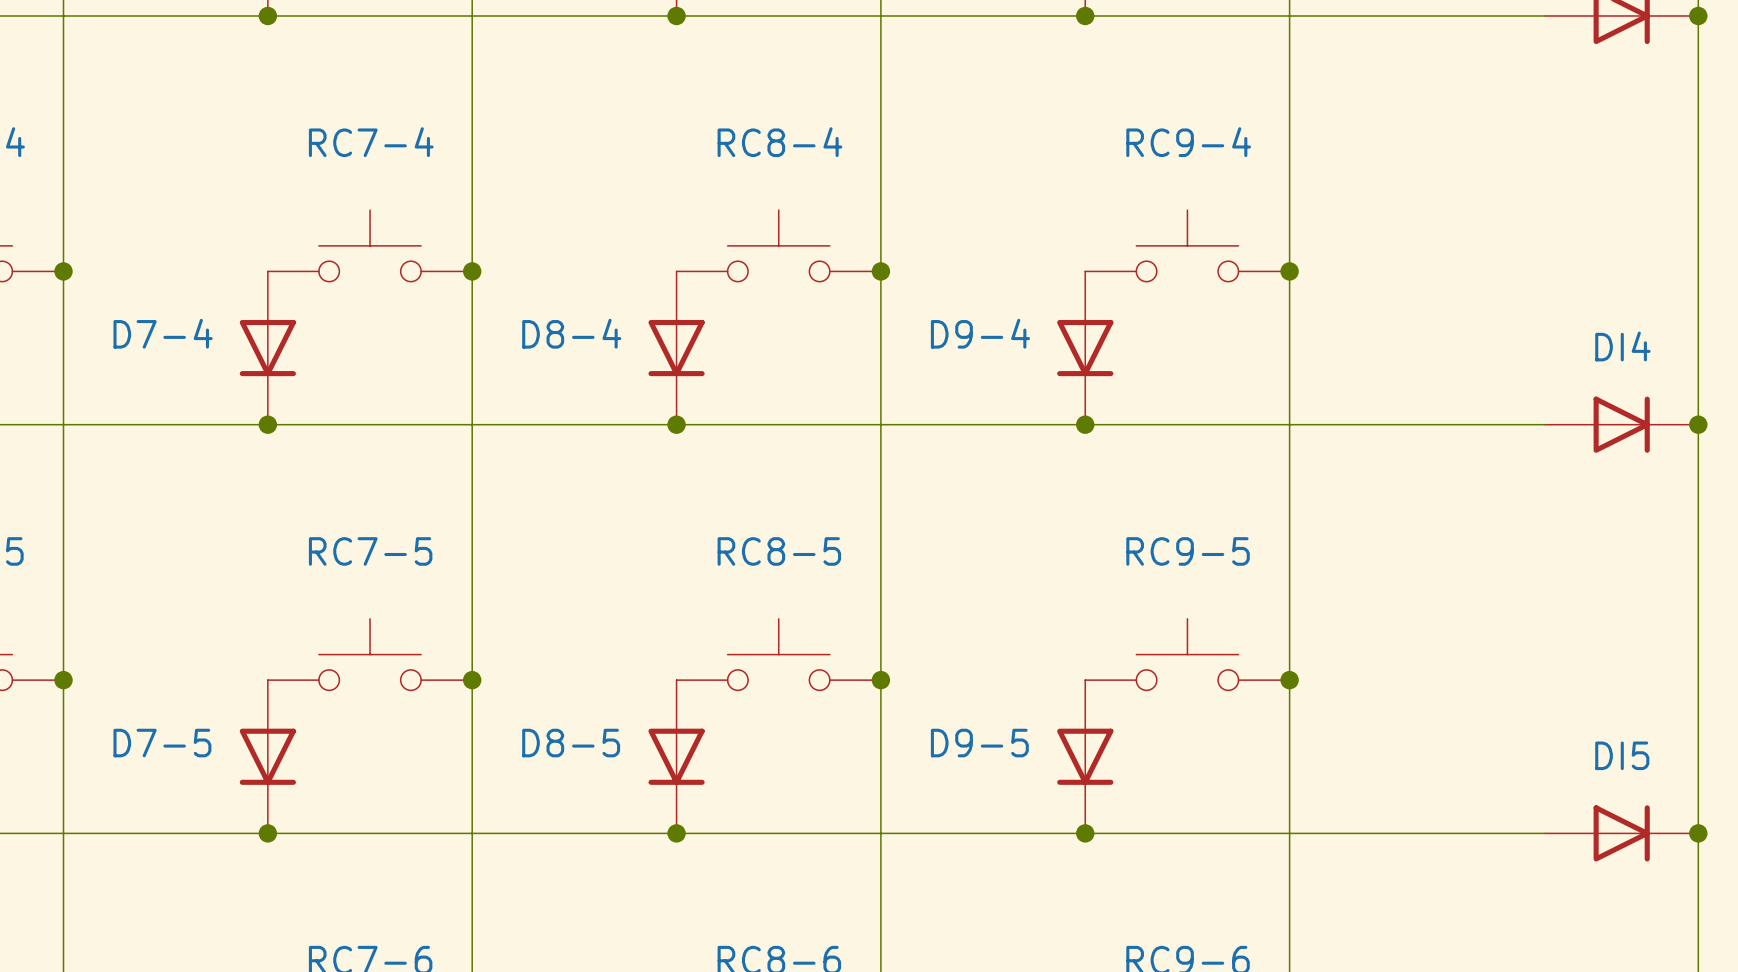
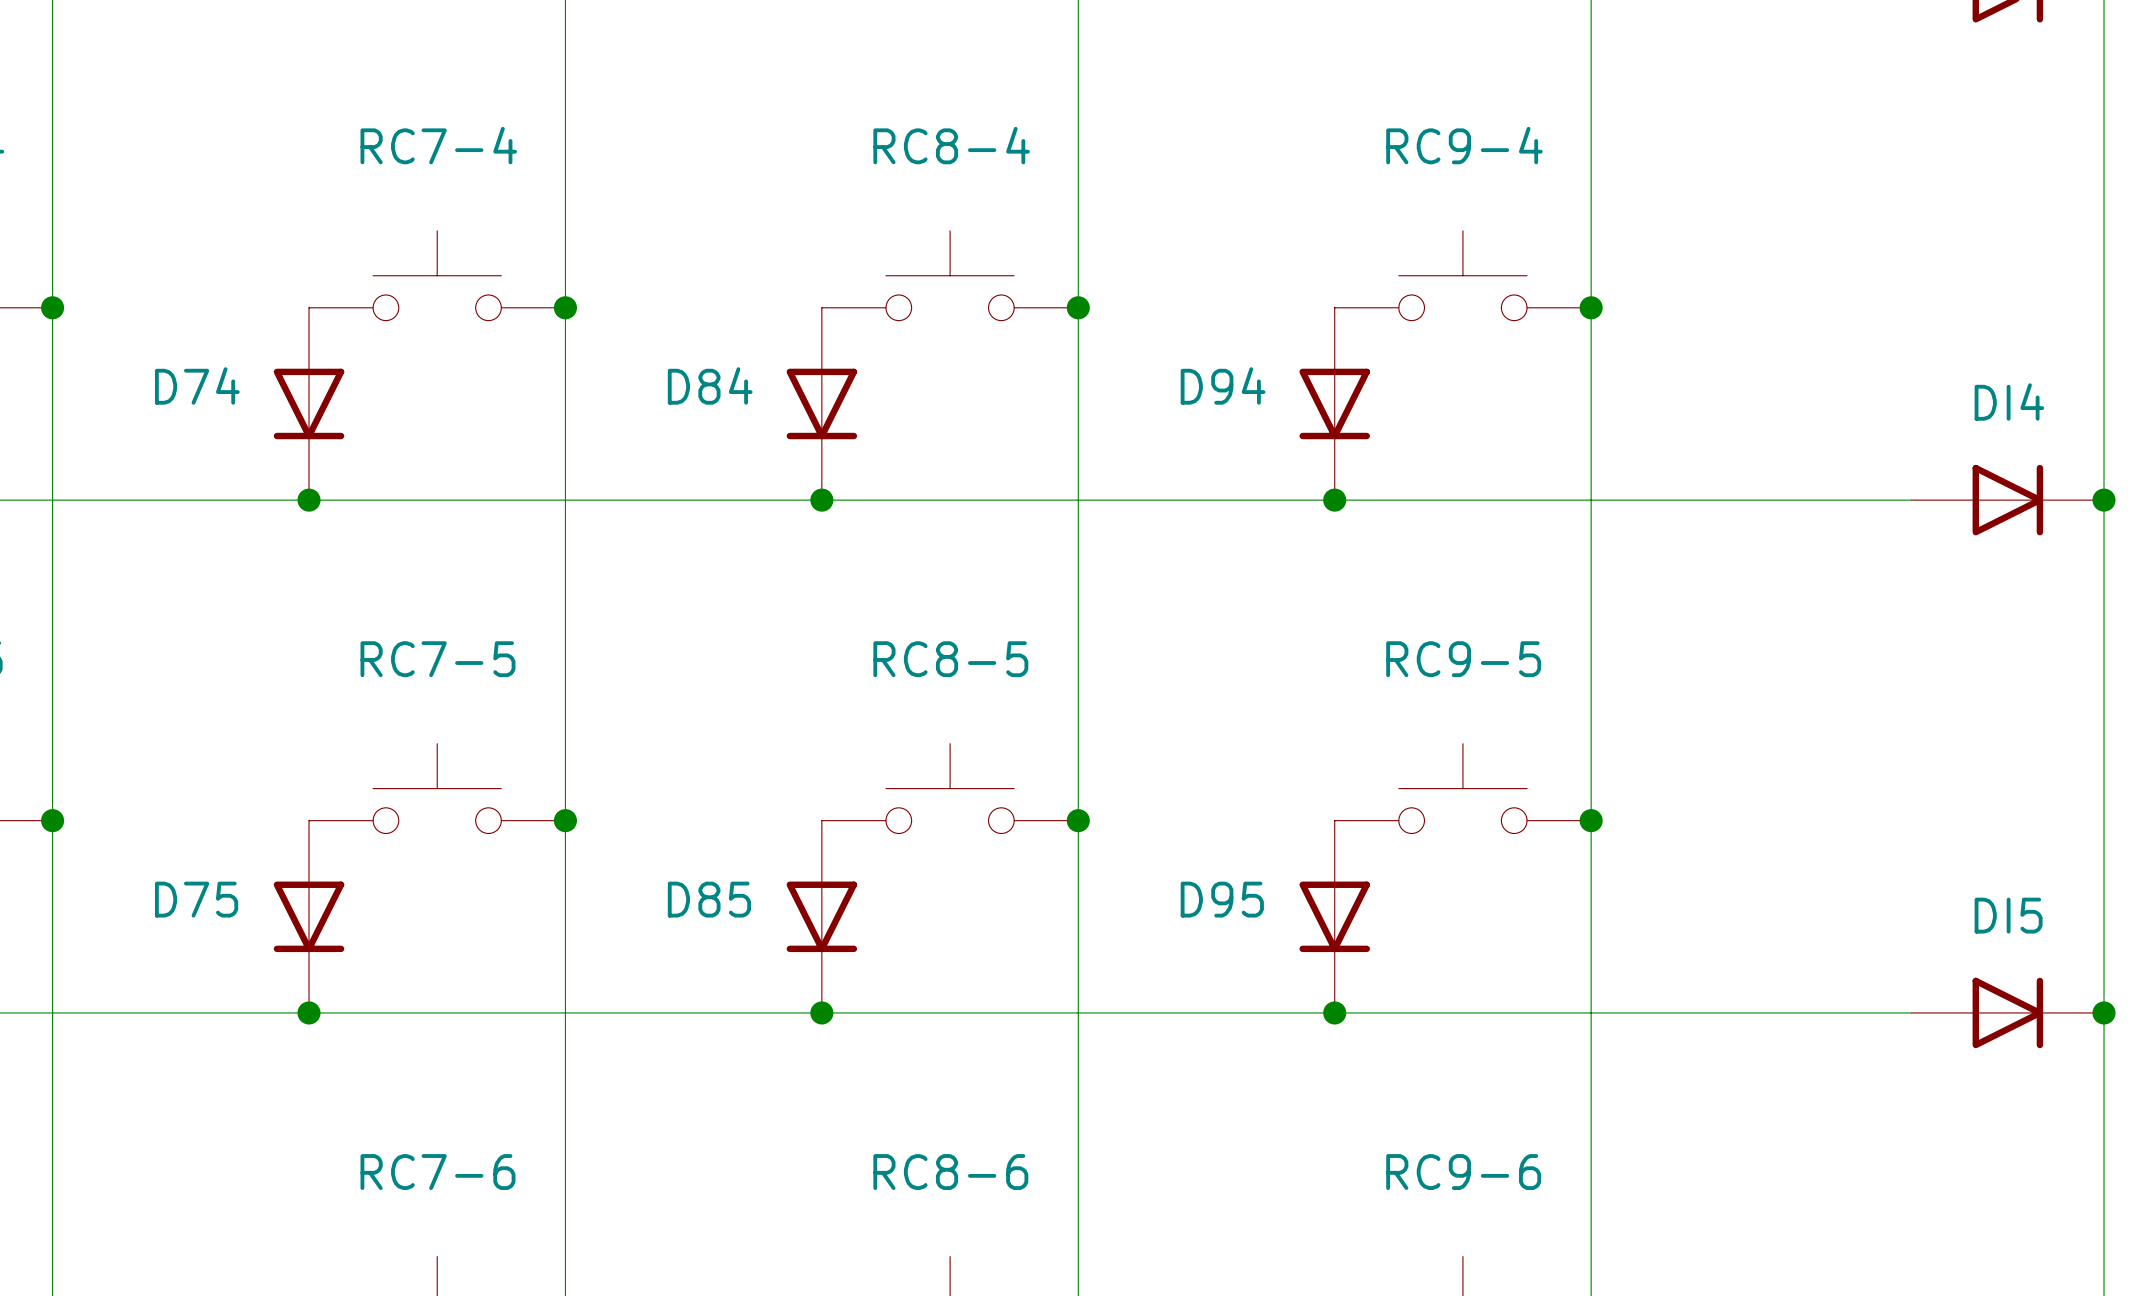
D7-4 name: D7-4 (163, 333) -> D74 (197, 385)
D8-4 name: D8-4 (571, 333) -> D84 (710, 385)
D9-4 name: D9-4 (980, 333) -> D94 (1223, 385)
D7-5 name: D7-5 (162, 743) -> D75 (196, 899)
D8-5 name: D8-5 (571, 743) -> D85 (709, 899)
D9-5 name: D9-5 (979, 743) -> D95 (1222, 899)

